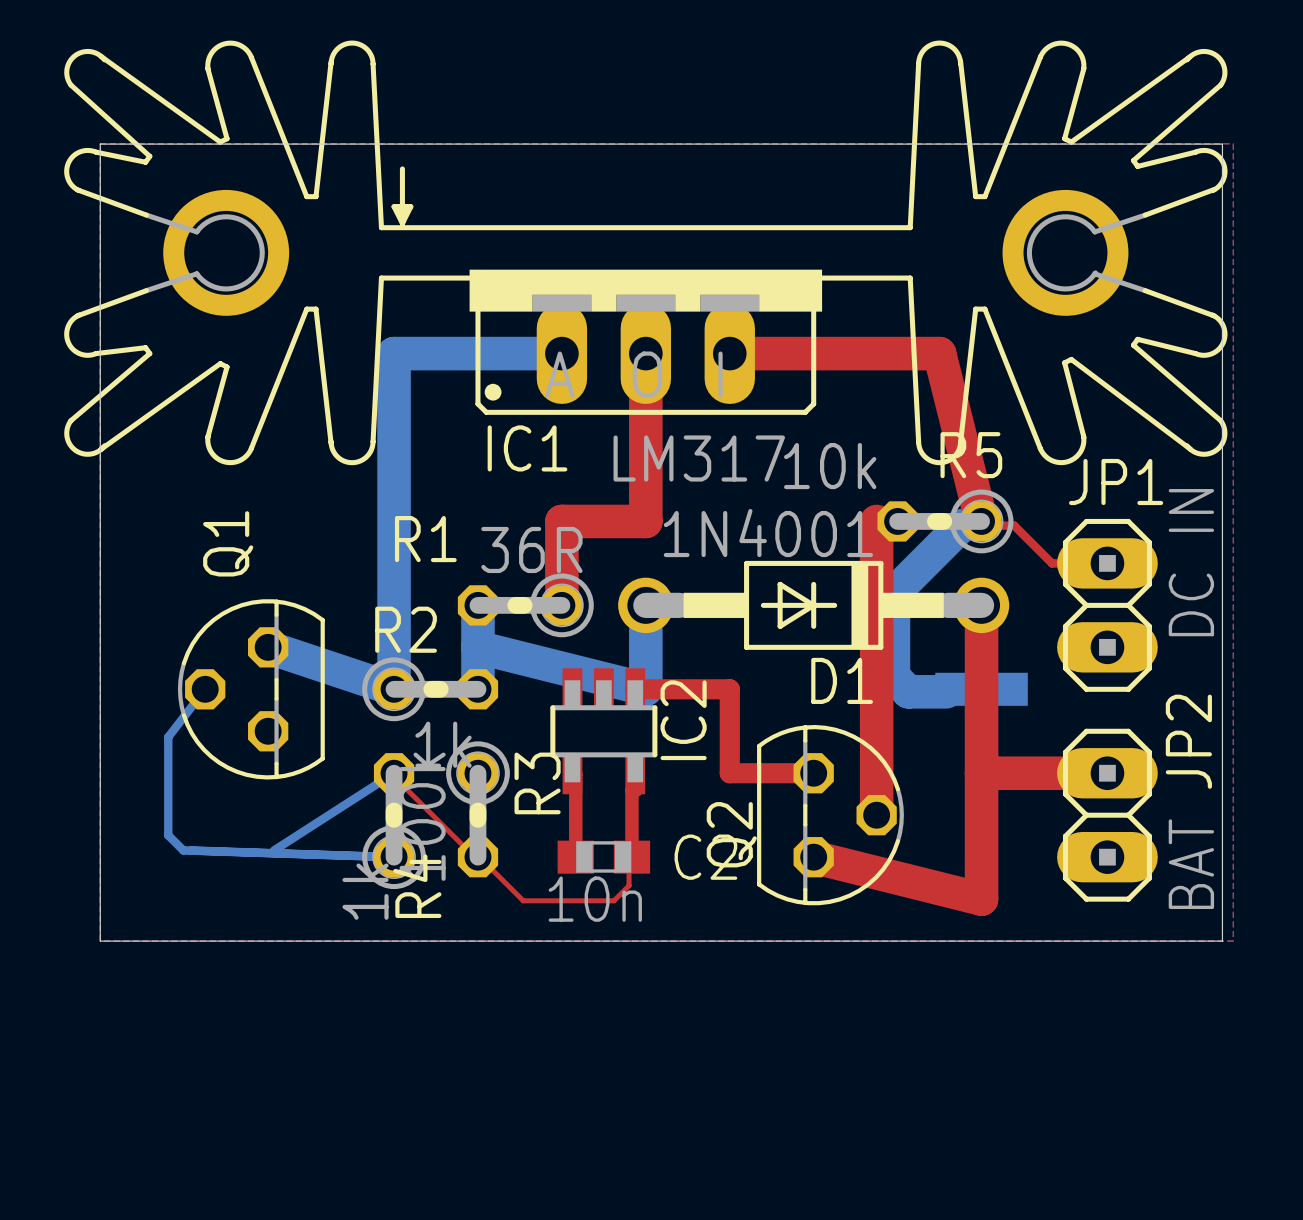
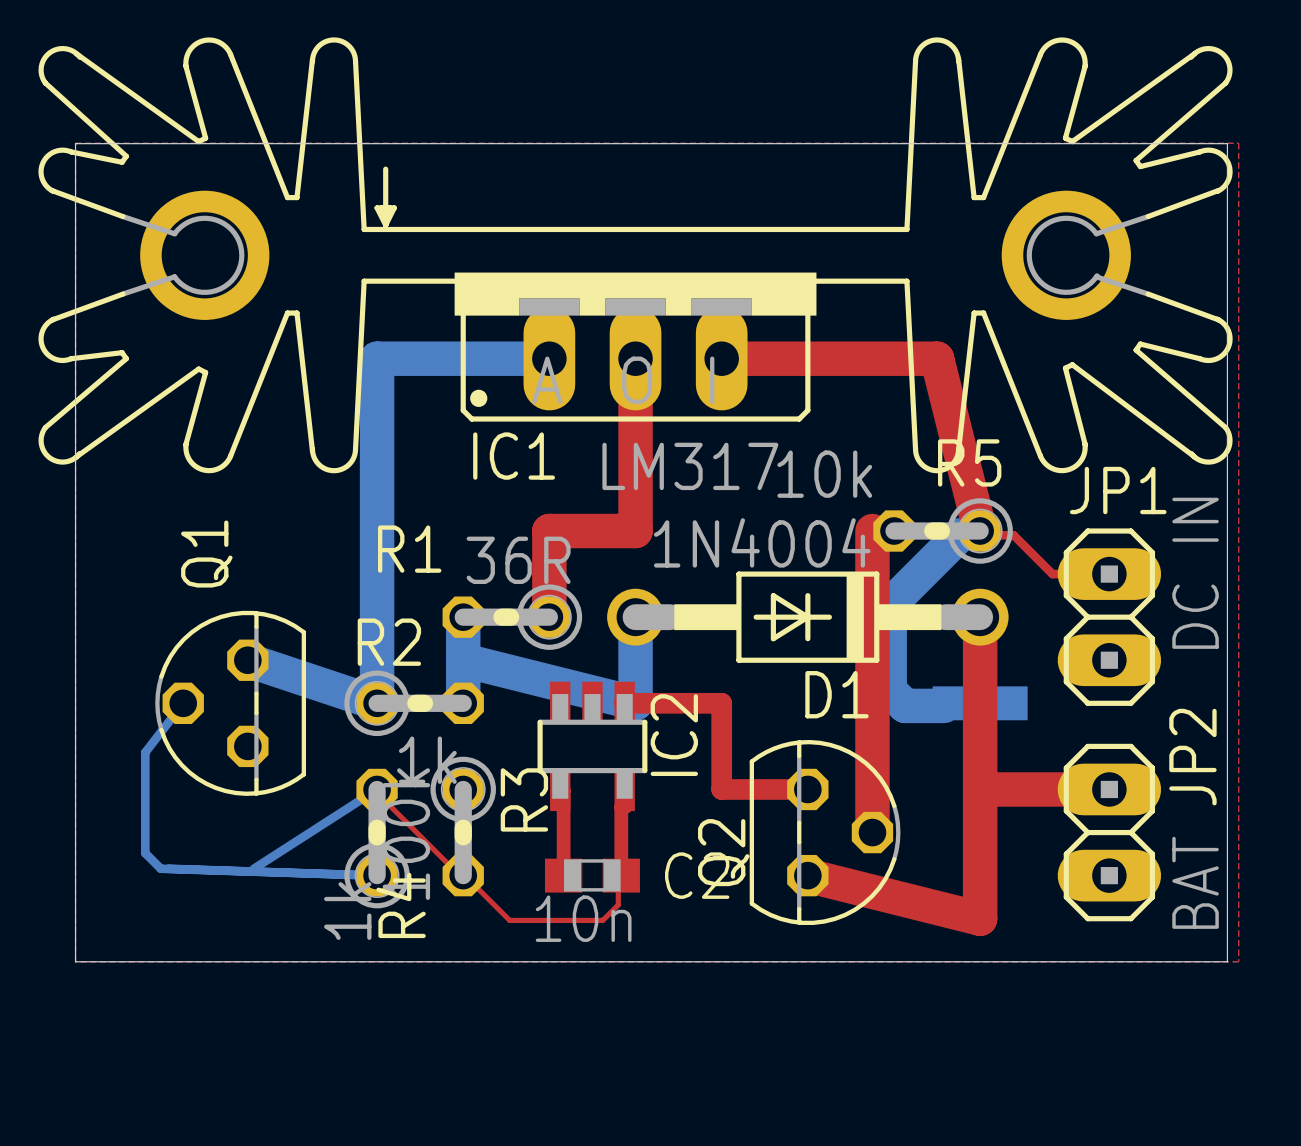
D1 value: 1N4001 (768, 533) -> 1N4004 (762, 542)

